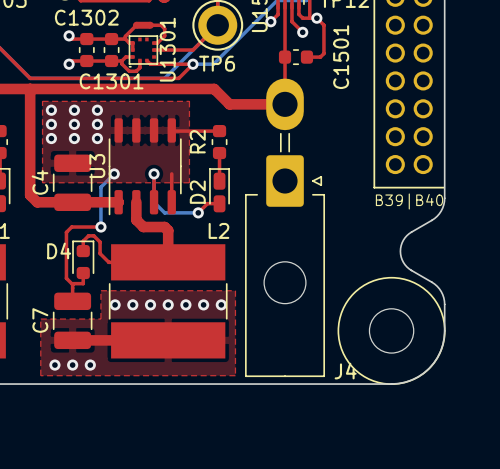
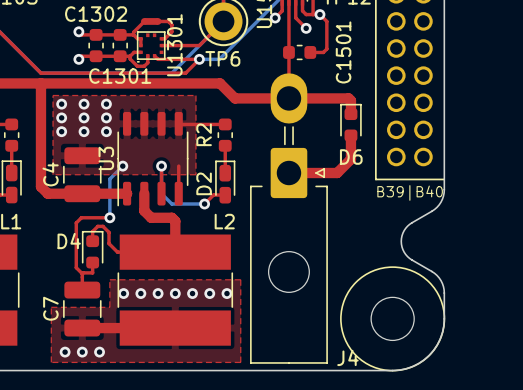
top track: none -> (288, 98) (348, 98) (350, 100) (350, 114)
D6: none -> (350, 122)
top track: none -> (350, 135) (350, 159) (337, 173) (288, 173)

